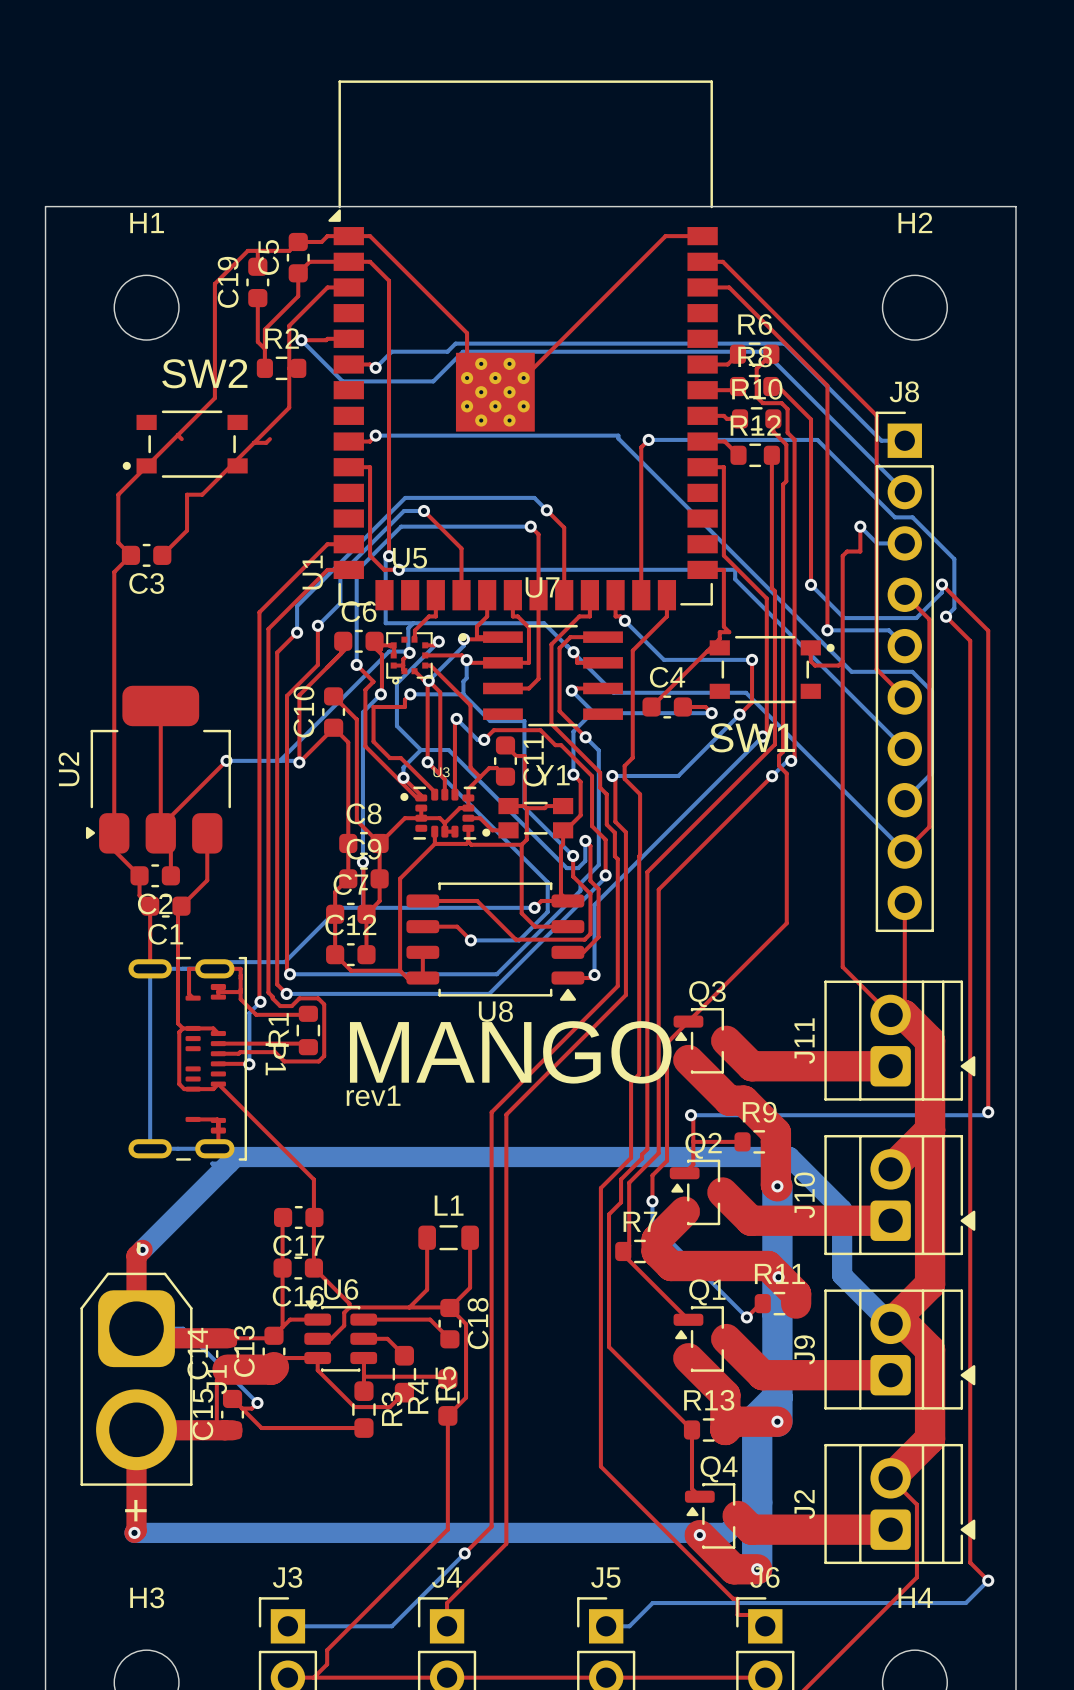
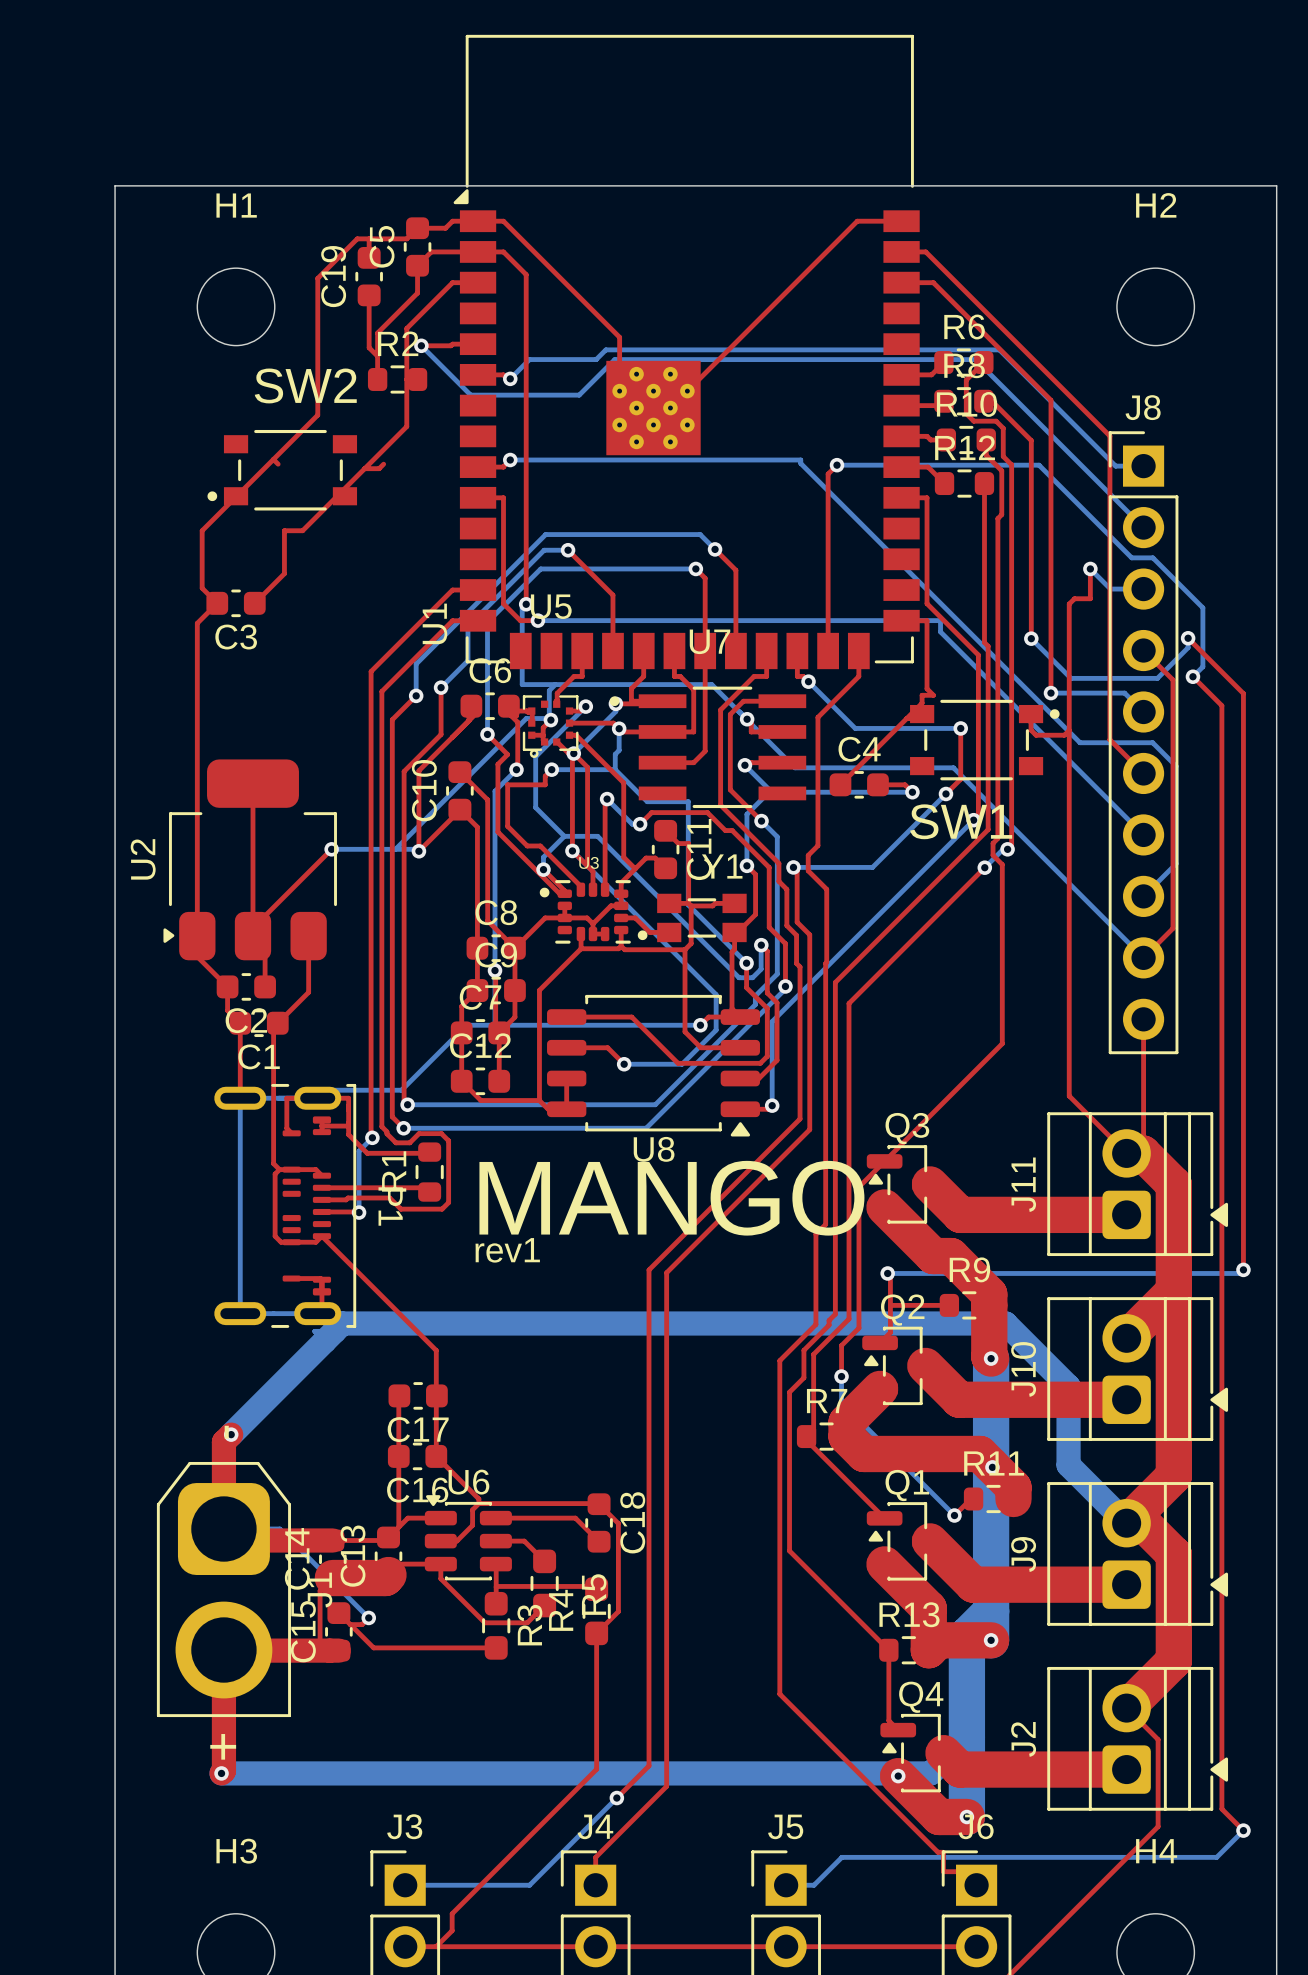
top track: (427, 1237) (427, 1289) (409, 1307) -> none
L1: (448, 1237) -> none
top track: (470, 1237) (470, 1287) (455, 1302) -> none

